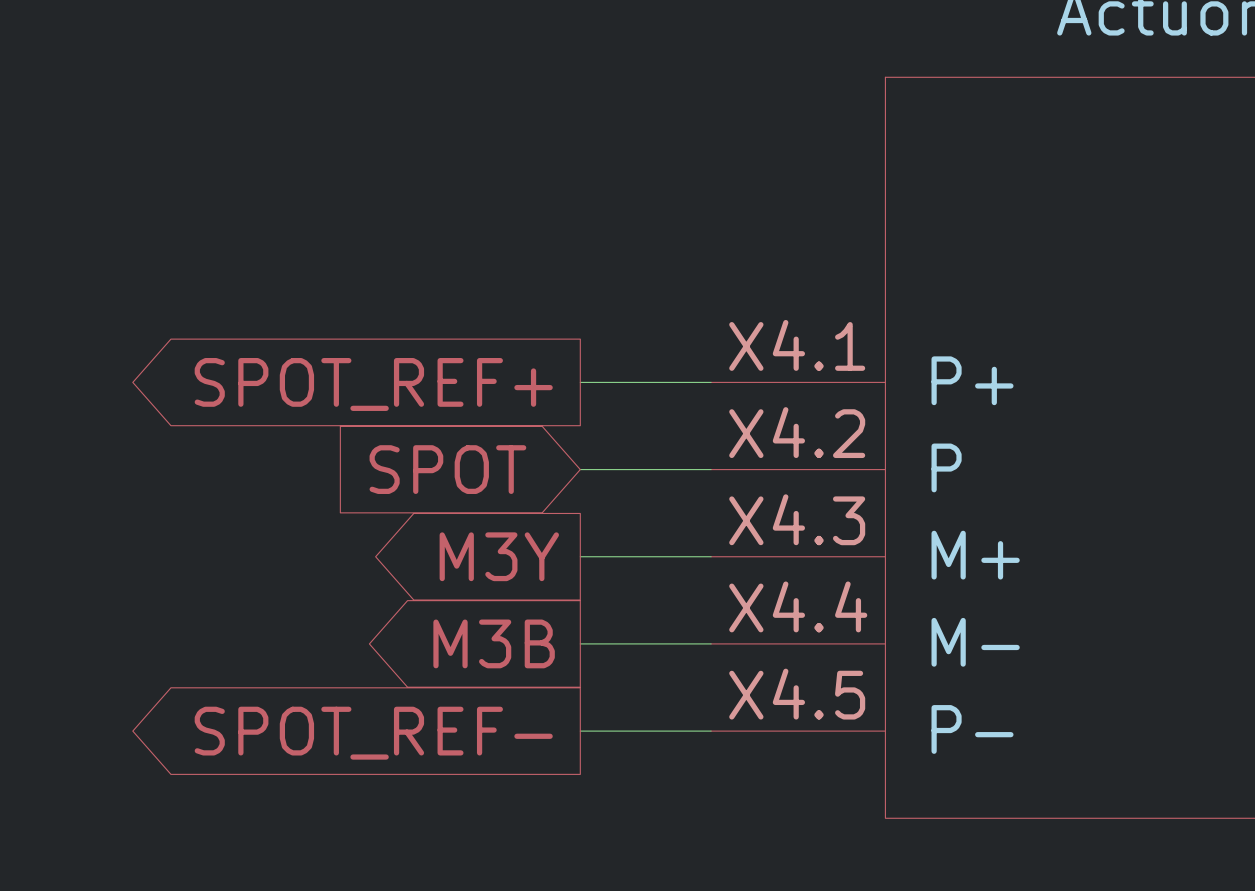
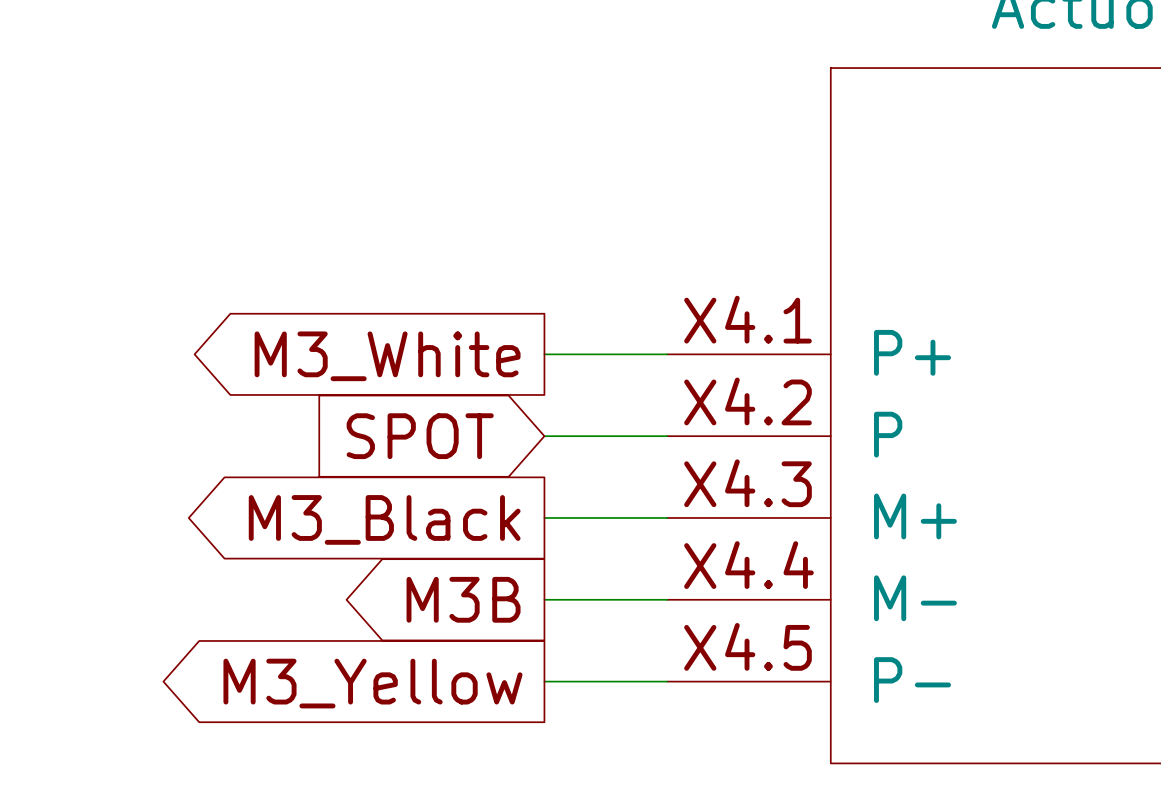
global label: SPOT_REF+ (373, 384) -> M3_White (387, 356)
global label: M3Y (499, 556) -> M3_Black (384, 519)
global label: SPOT_REF- (373, 733) -> M3_Yellow (372, 683)

